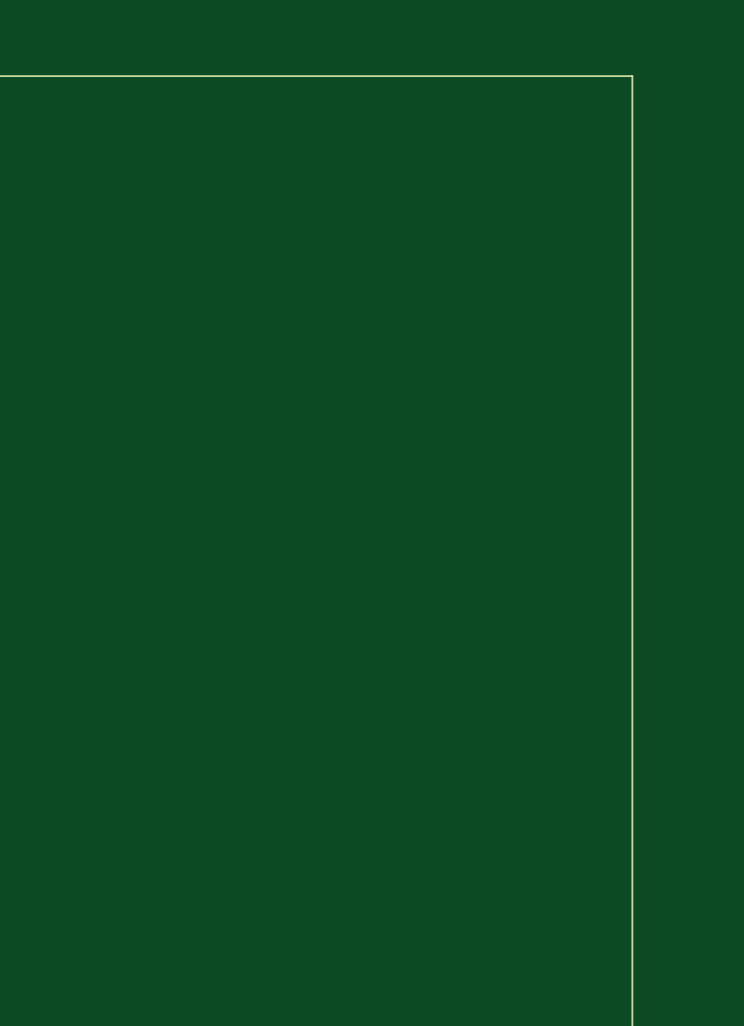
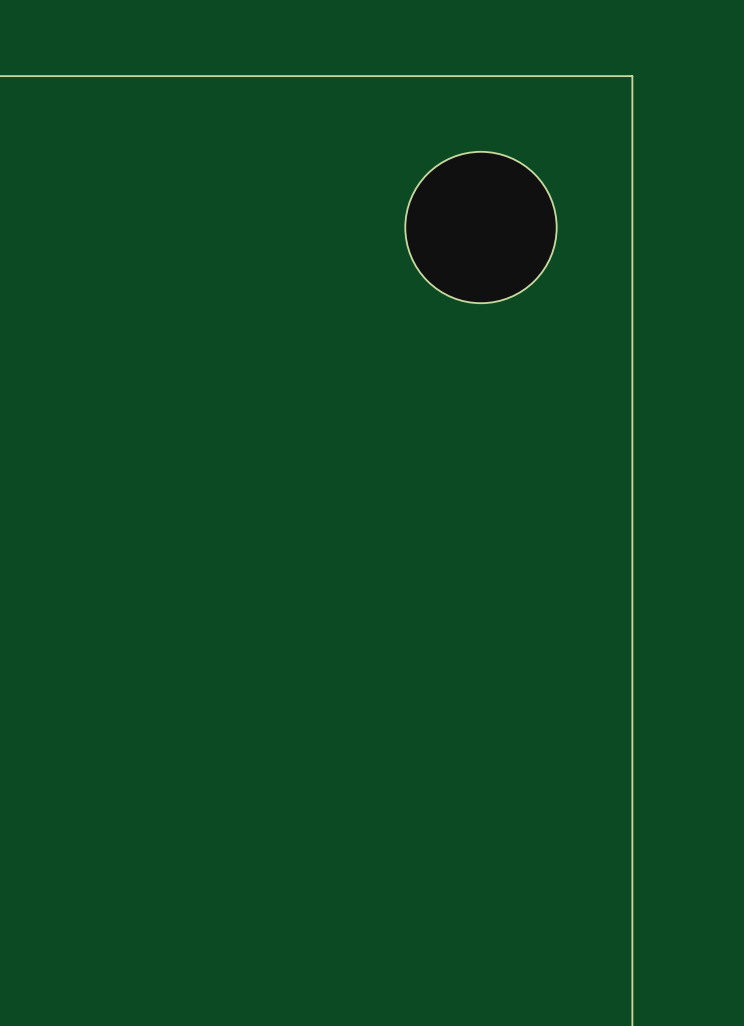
hole: none -> (480, 227)

